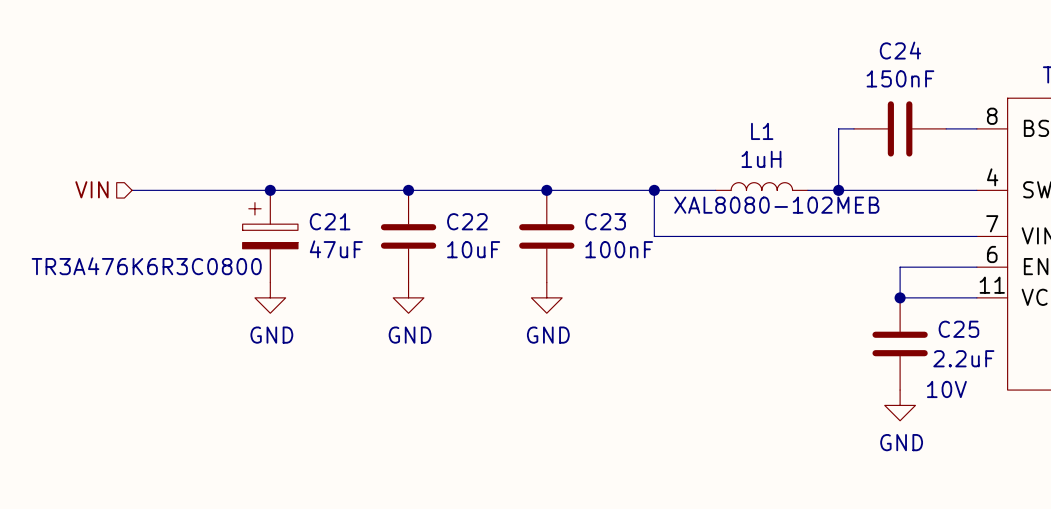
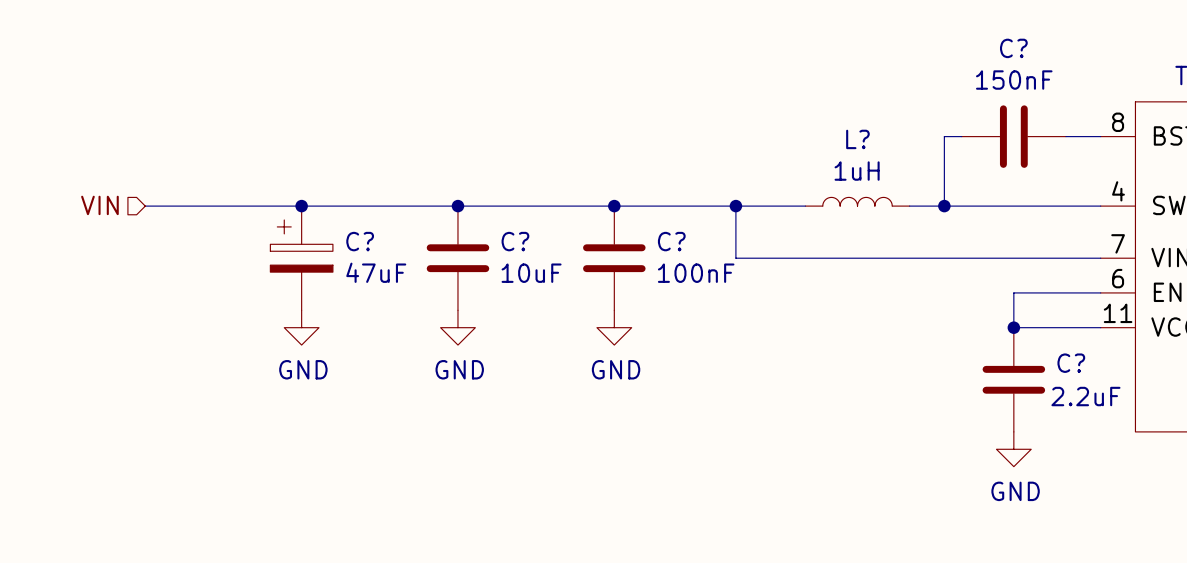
C24 name: C24 (900, 50) -> C? (1013, 48)
L1 name: L1 (762, 131) -> L? (857, 139)
L1 text: XAL8080-102MEB (776, 205) -> none
C21 name: C21 (330, 221) -> C? (360, 241)
C22 name: C22 (467, 221) -> C? (515, 241)
C23 name: C23 (605, 221) -> C? (671, 241)
C21 text: TR3A476K6R3C0800 (146, 266) -> none
C25 name: C25 (958, 329) -> C? (1071, 363)
C25 text: 10V (946, 389) -> none

